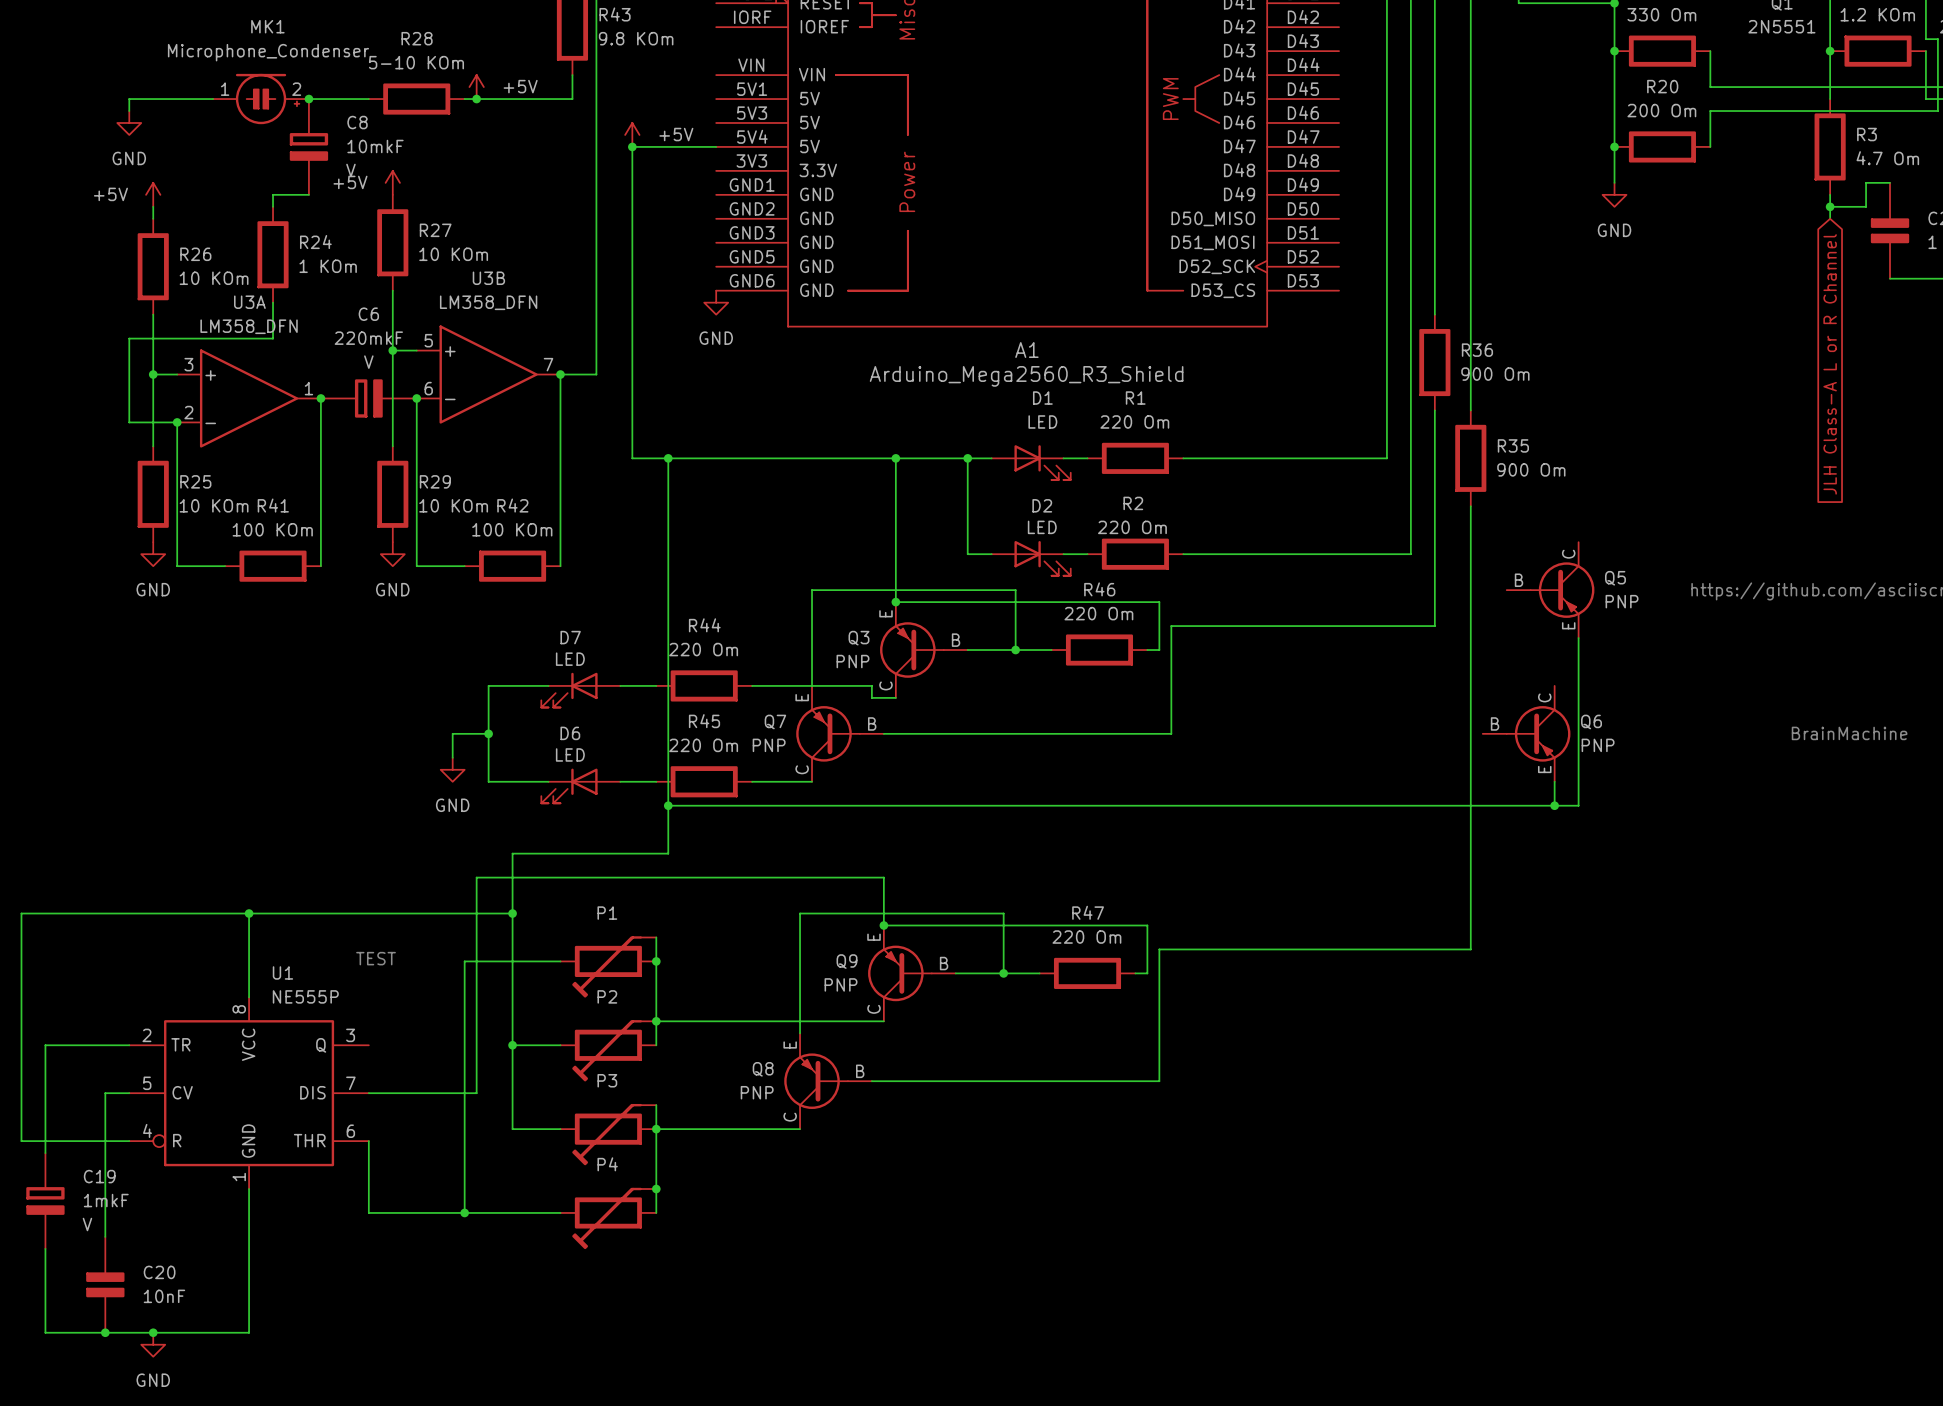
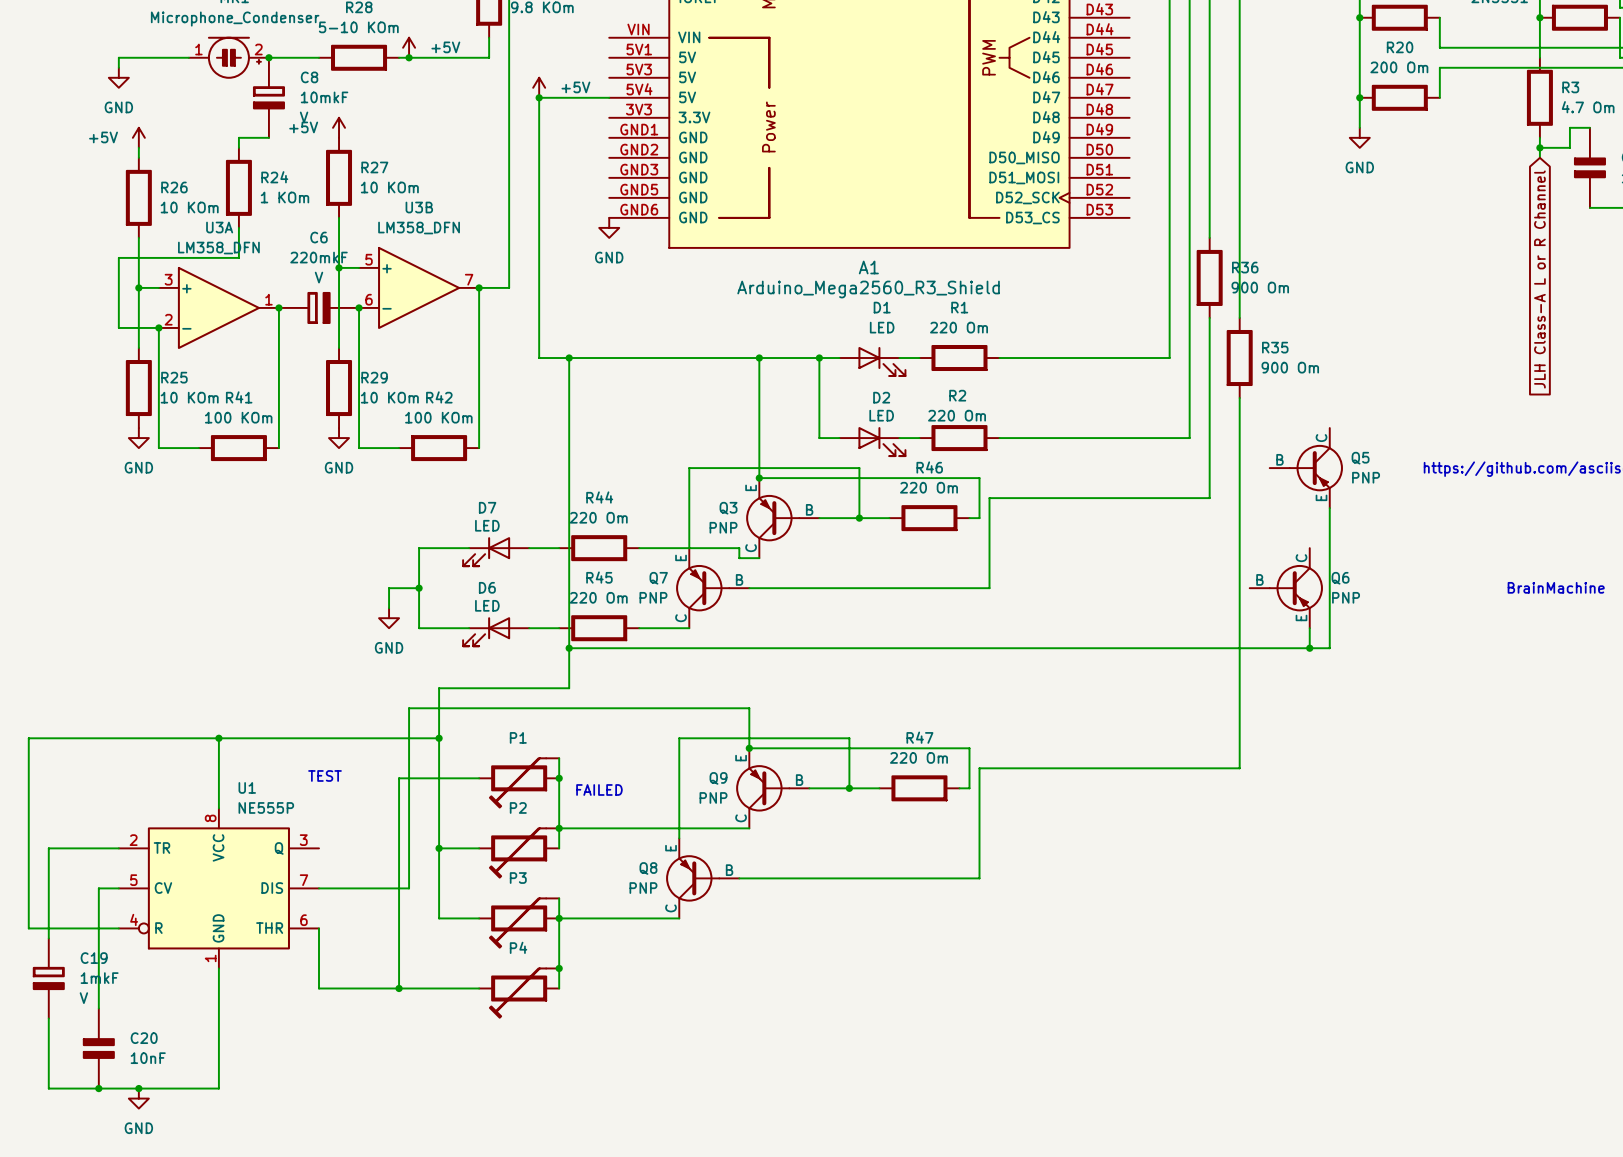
text: none -> FAILED (599, 789)

